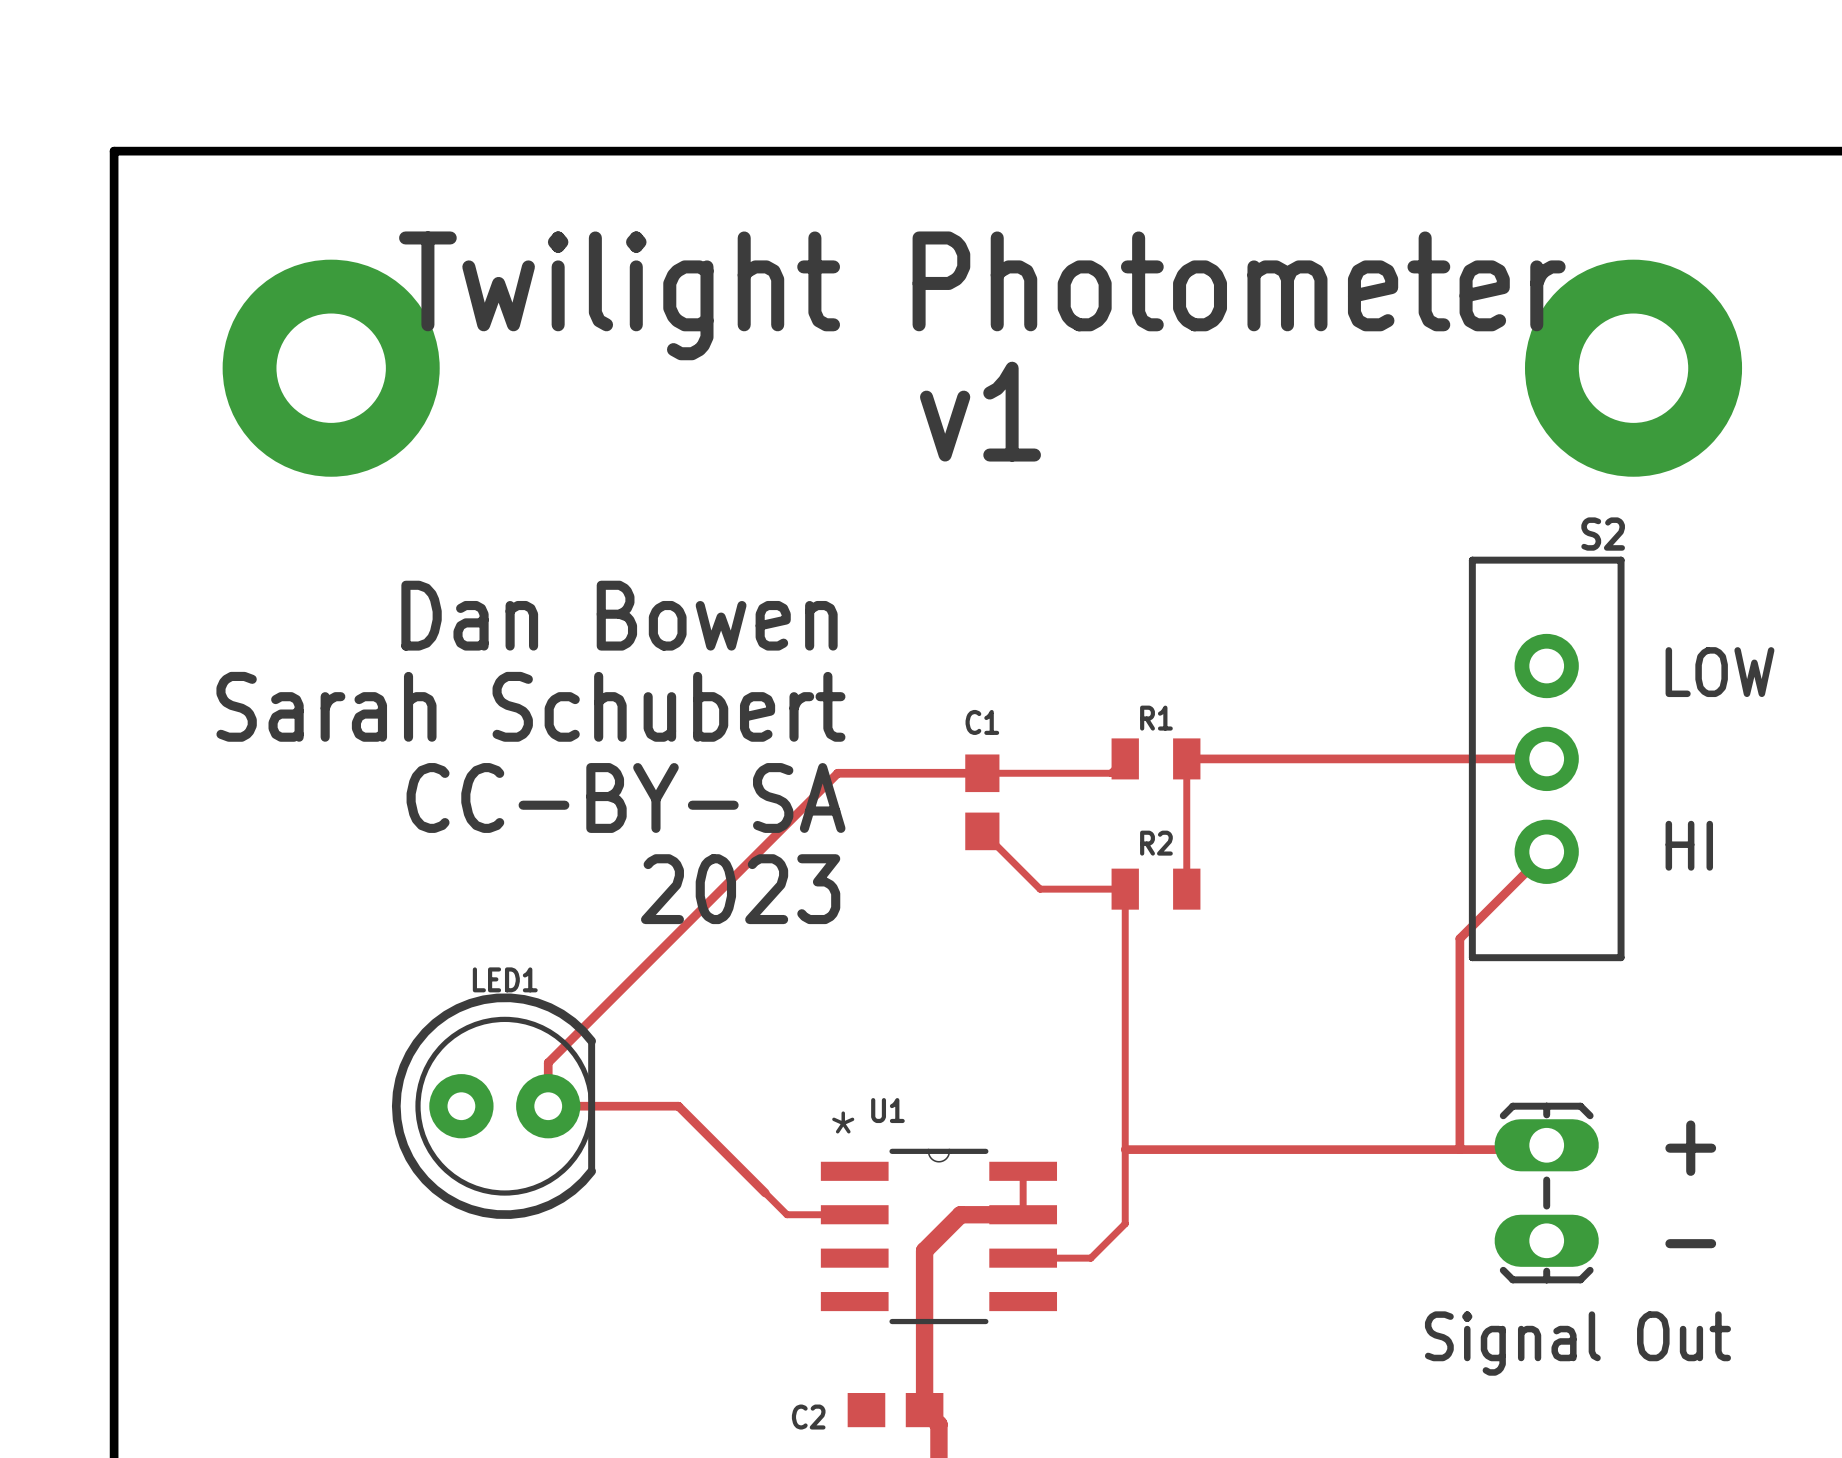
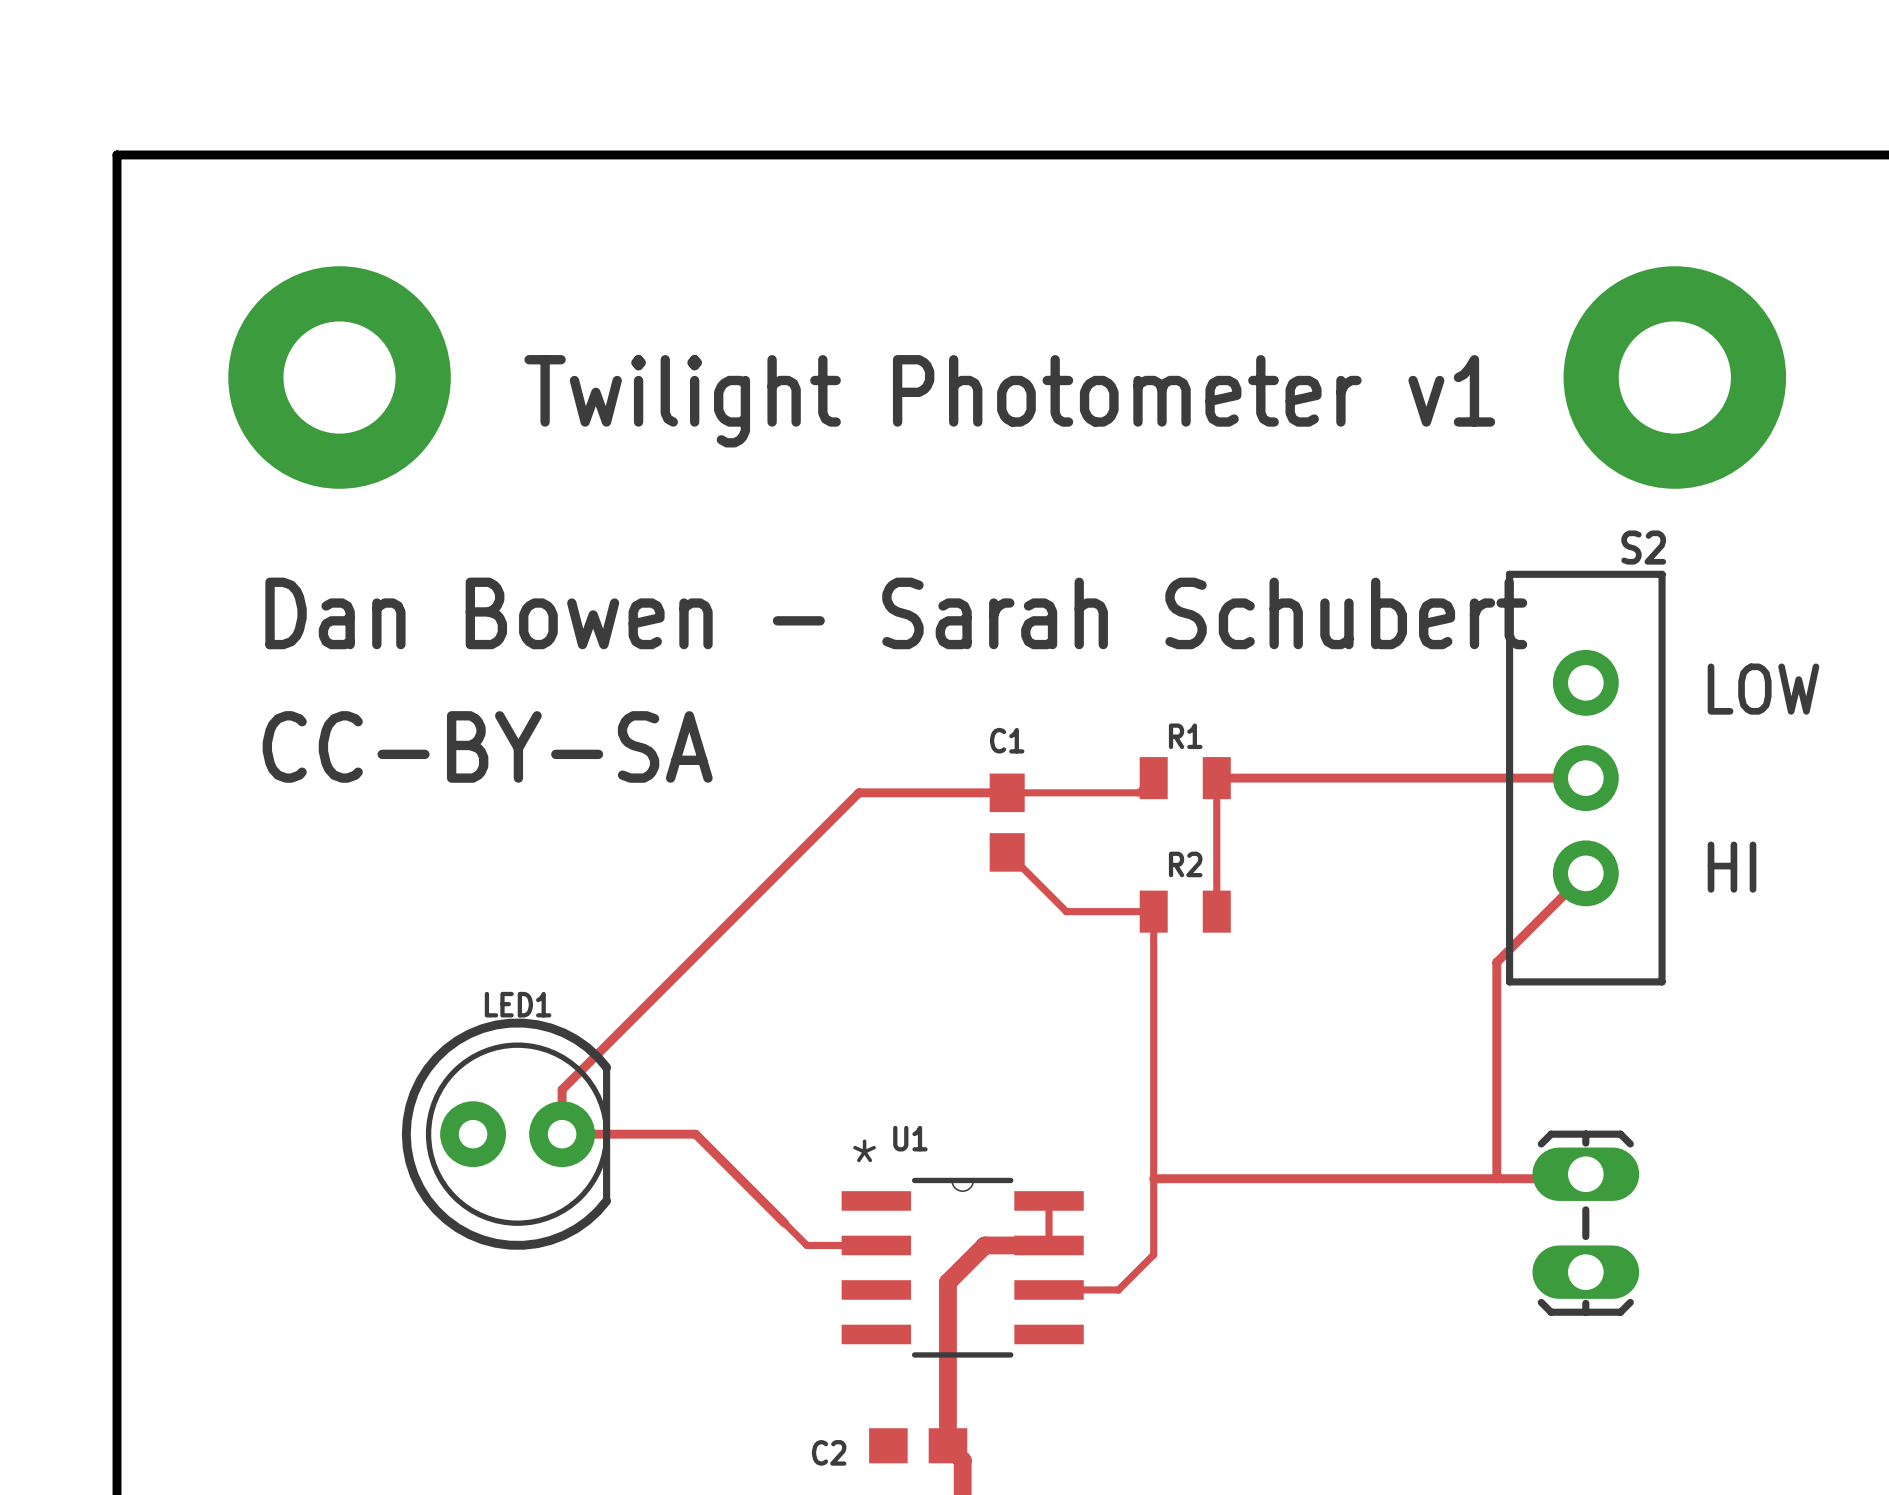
text: Twilight Photometer (982, 295) -> Twilight Photometer v1 (1009, 401)
text: v1 (980, 411) -> none
text: Dan Bowen (619, 615) -> none
text: Sarah Schubert (530, 706) -> Dan Bowen - Sarah Schubert (896, 613)
text position: CC-BY-SA (626, 797) -> CC-BY-SA (487, 746)
text: 2023 (740, 889) -> none
text: + (1690, 1148) -> none
text: - (1690, 1243) -> none
part value: Signal Out (1577, 1343) -> none

